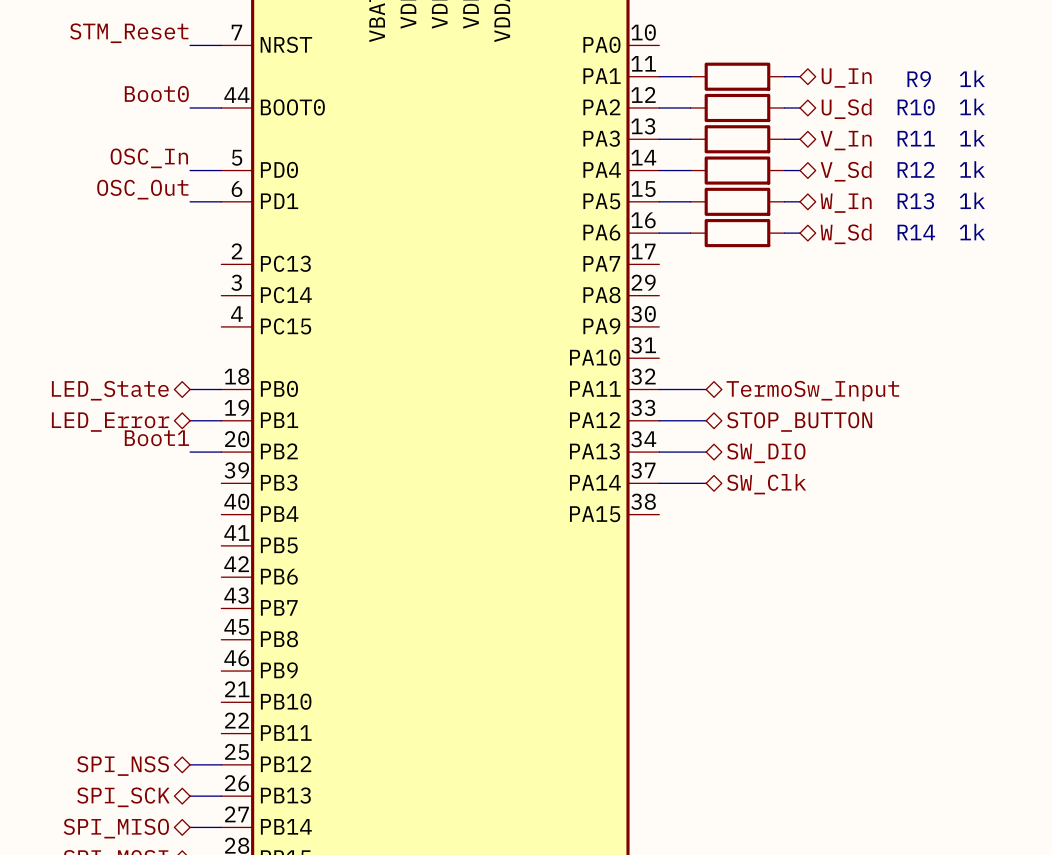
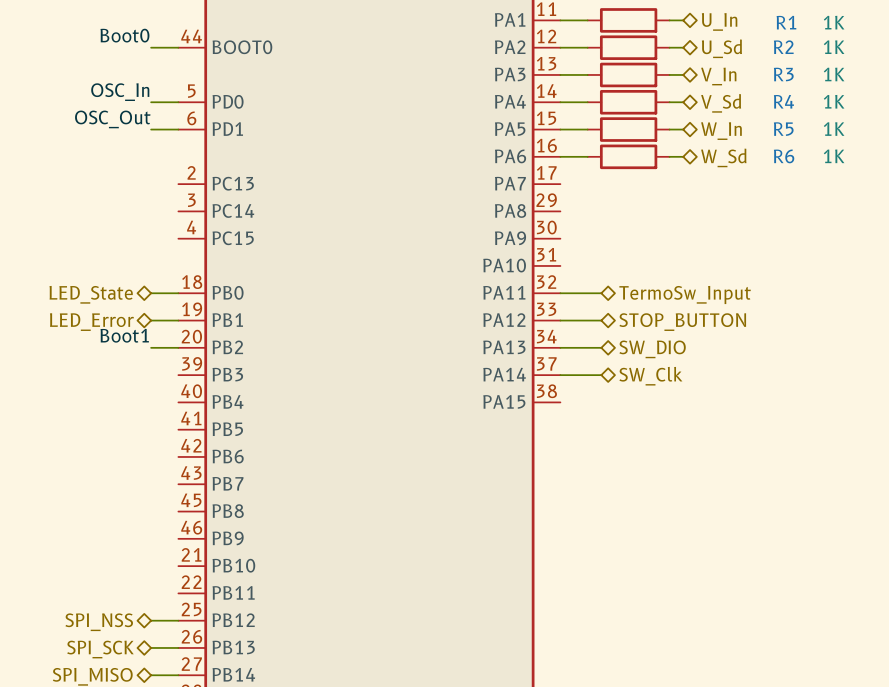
R9 value: 1k (972, 78) -> 1K (834, 22)
R9 name: R9 (919, 79) -> R1 (786, 22)
R10 value: 1k (972, 106) -> 1K (834, 47)
R10 name: R10 (916, 107) -> R2 (783, 47)
R11 name: R11 (916, 138) -> R3 (783, 74)
R11 value: 1k (972, 138) -> 1K (834, 74)
R12 name: R12 (916, 169) -> R4 (783, 101)
R12 value: 1k (972, 169) -> 1K (834, 101)
R13 value: 1k (972, 200) -> 1K (834, 129)
R13 name: R13 (915, 201) -> R5 (783, 129)
R14 name: R14 (916, 232) -> R6 (784, 156)
R14 value: 1k (972, 232) -> 1K (834, 156)

